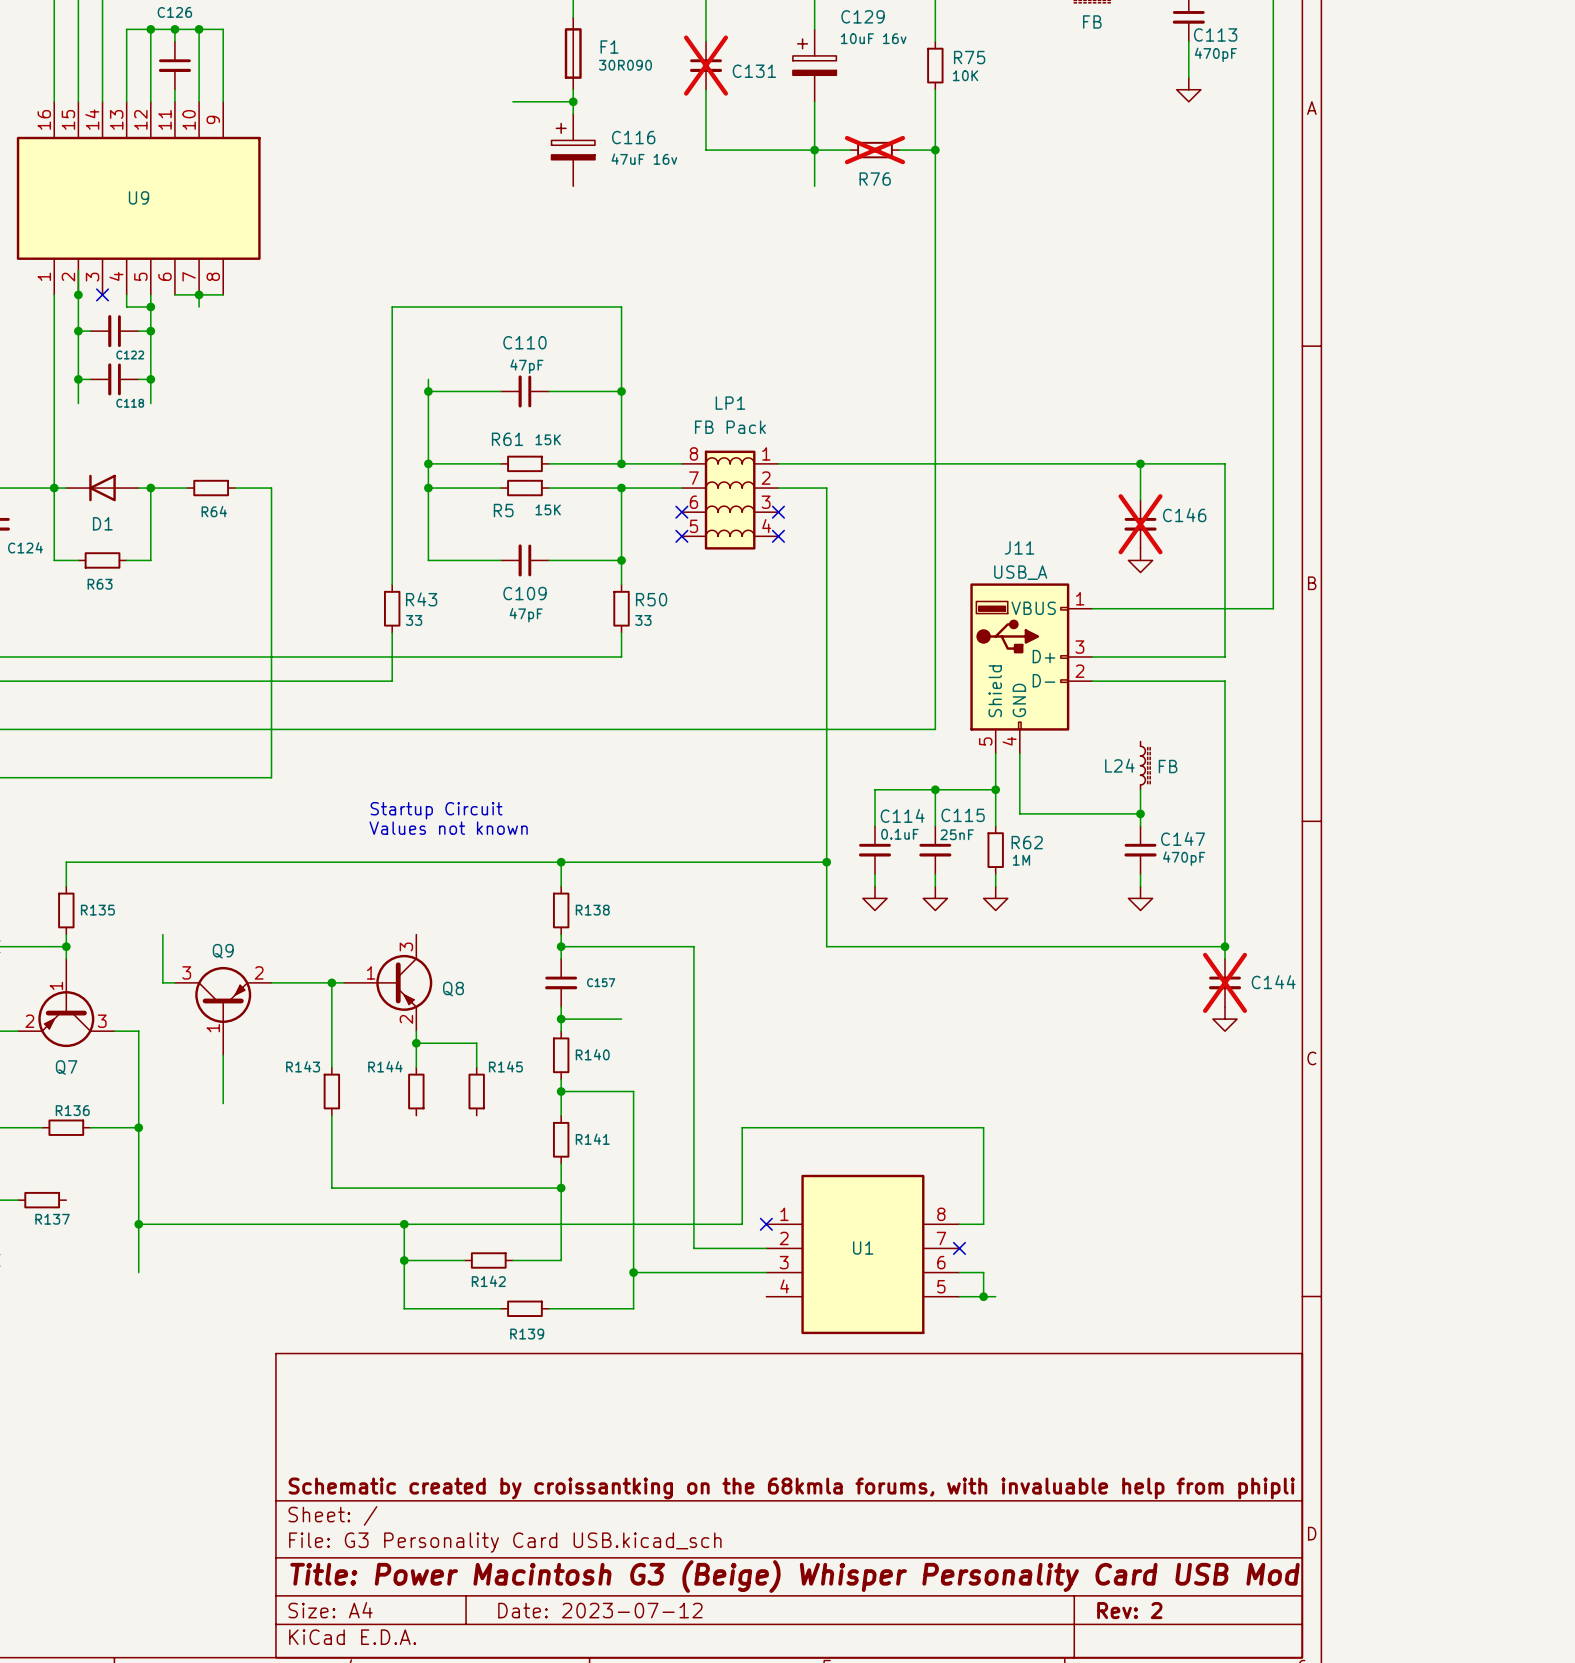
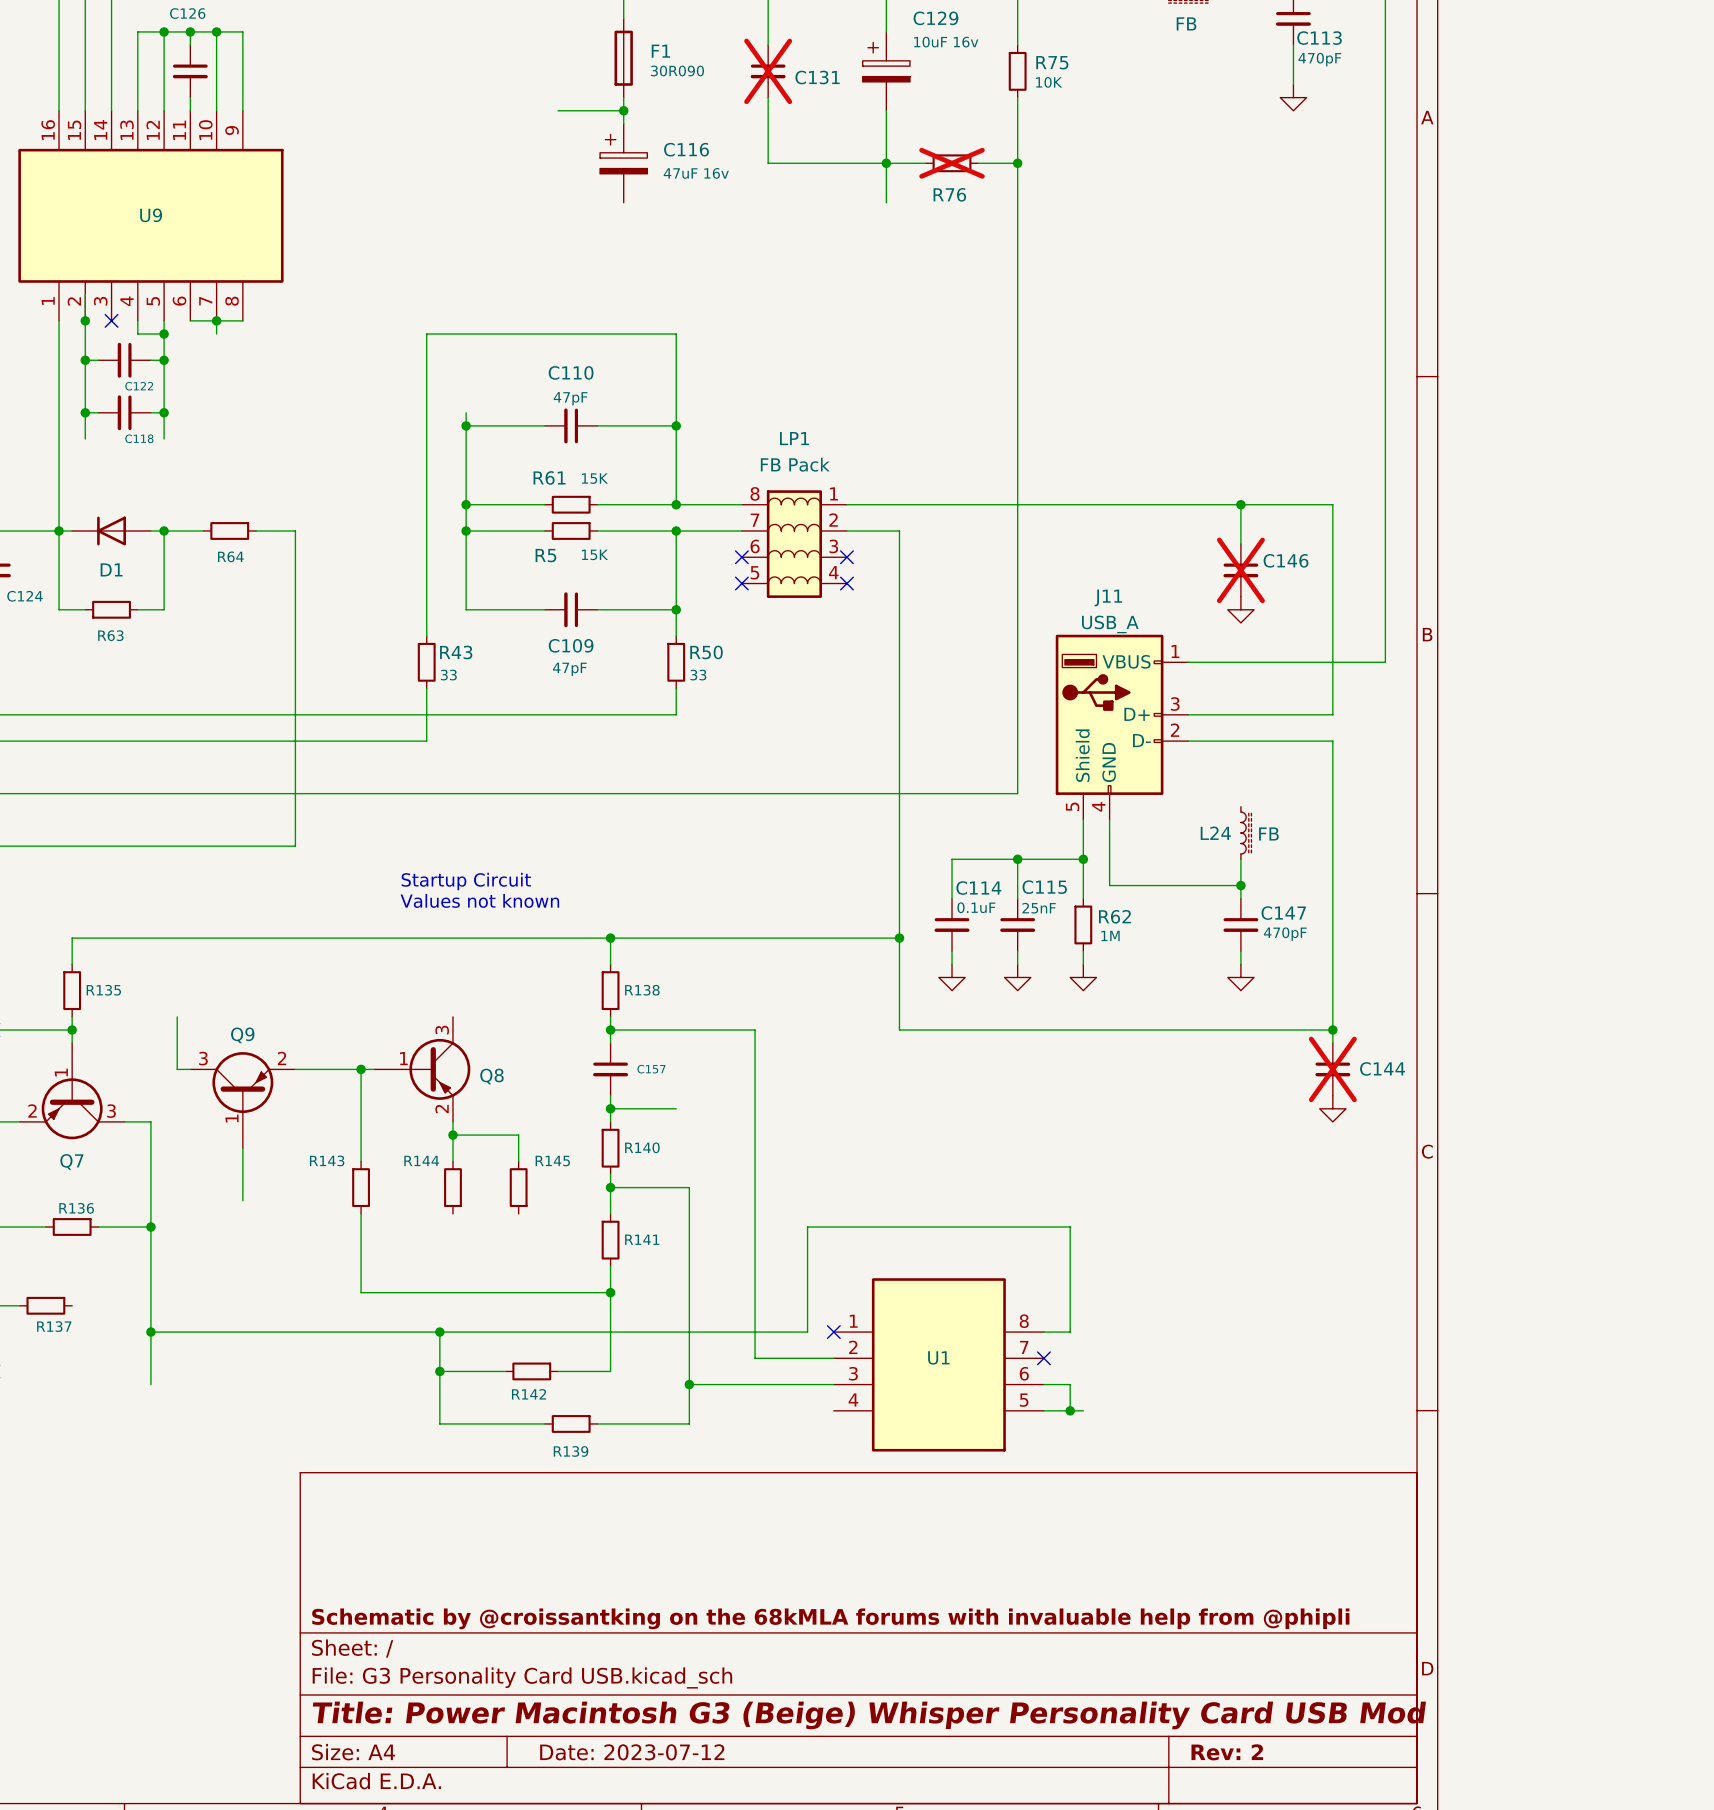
title block: Schematic created by croissantking on the 68kmla forums, with invaluable help from phipli (791, 1488) -> Schematic by @croissantking on the 68kMLA forums with invaluable help from @phipli (830, 1618)

